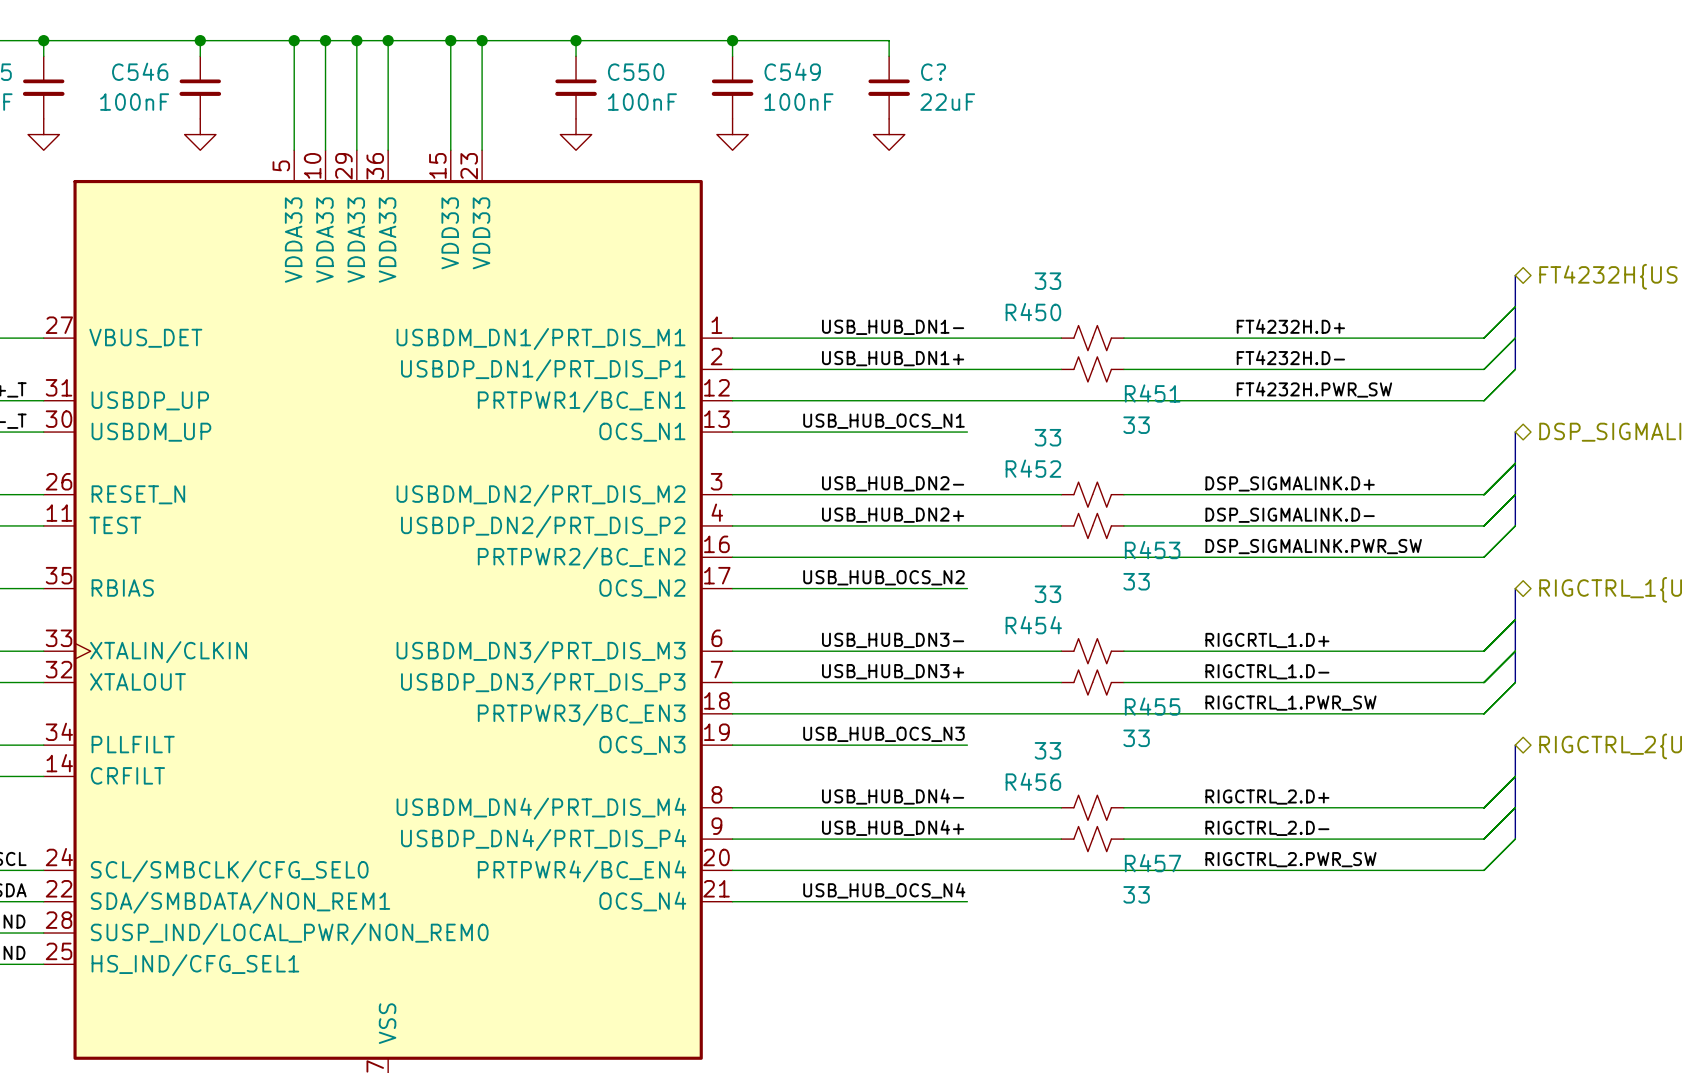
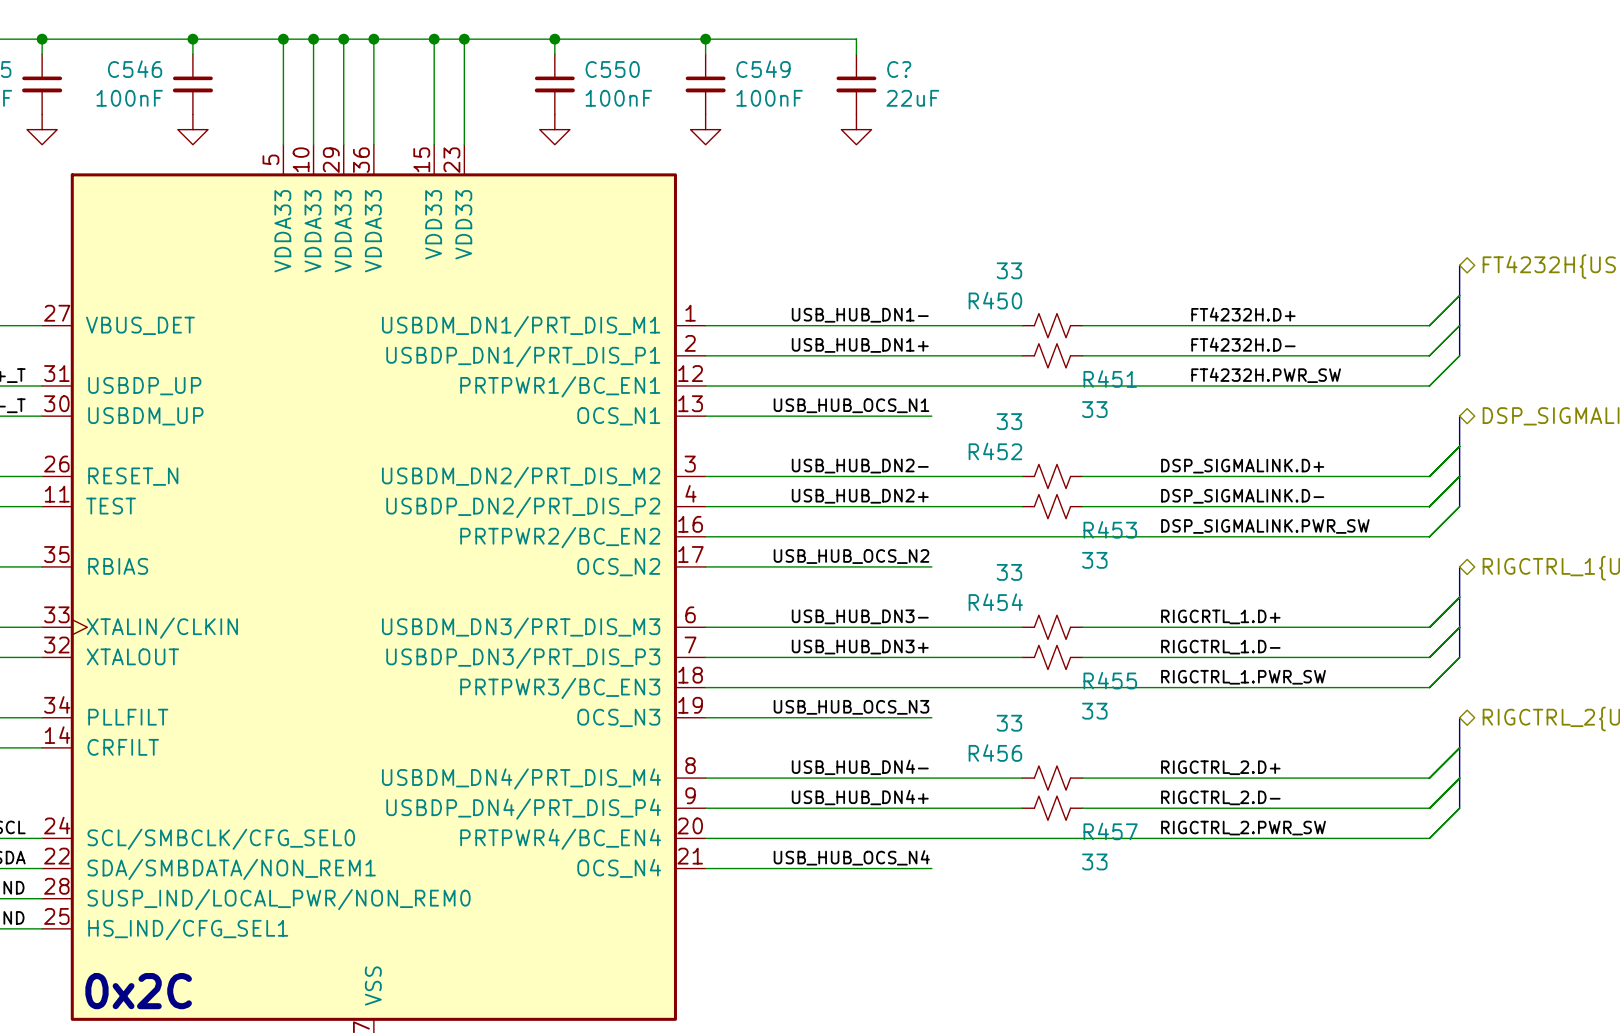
text: none -> 0x2C (138, 991)

